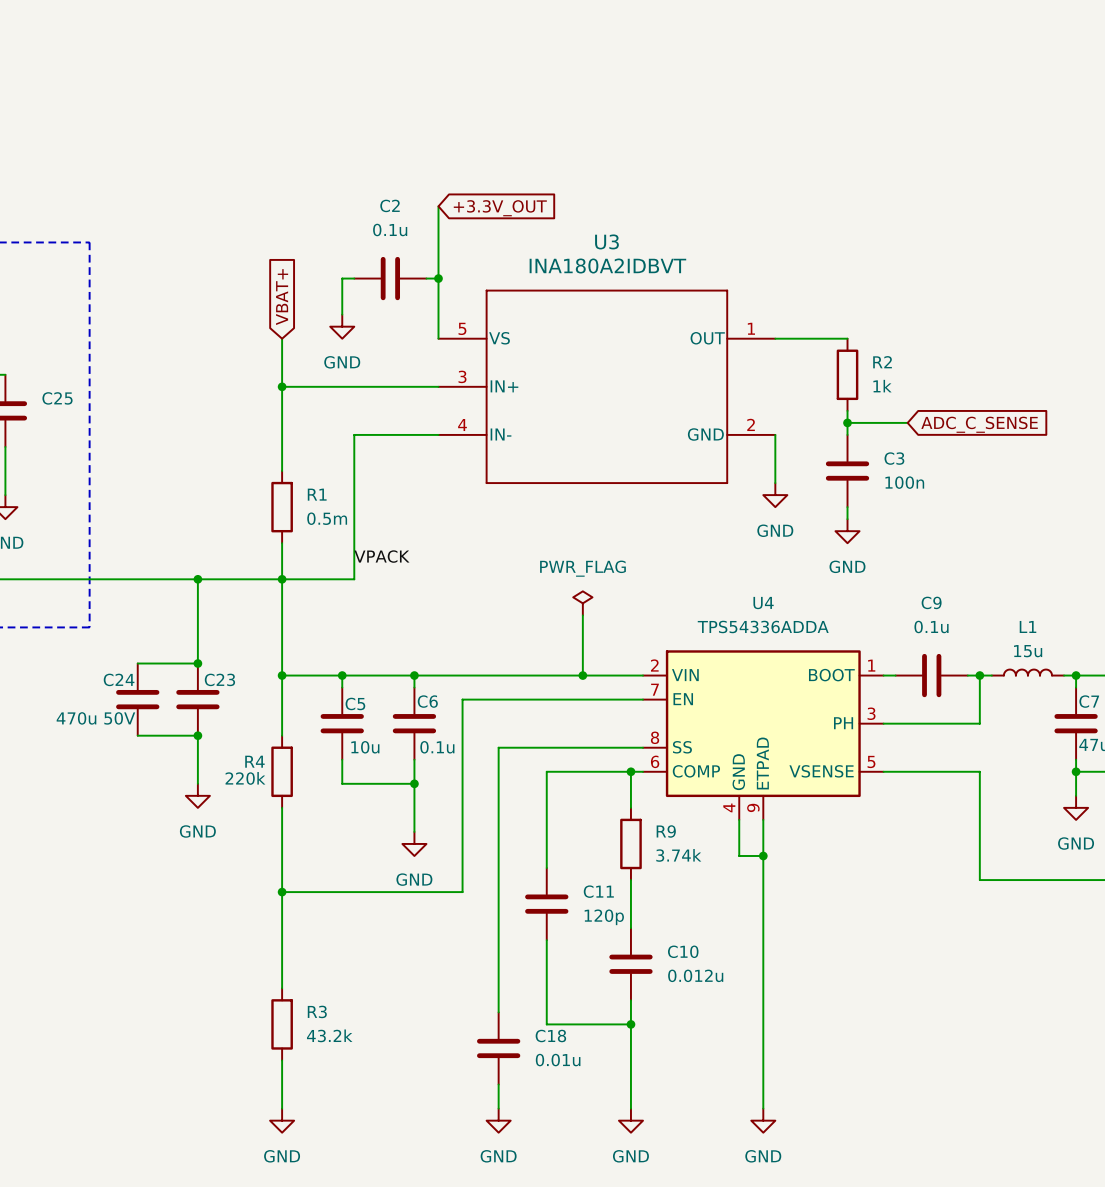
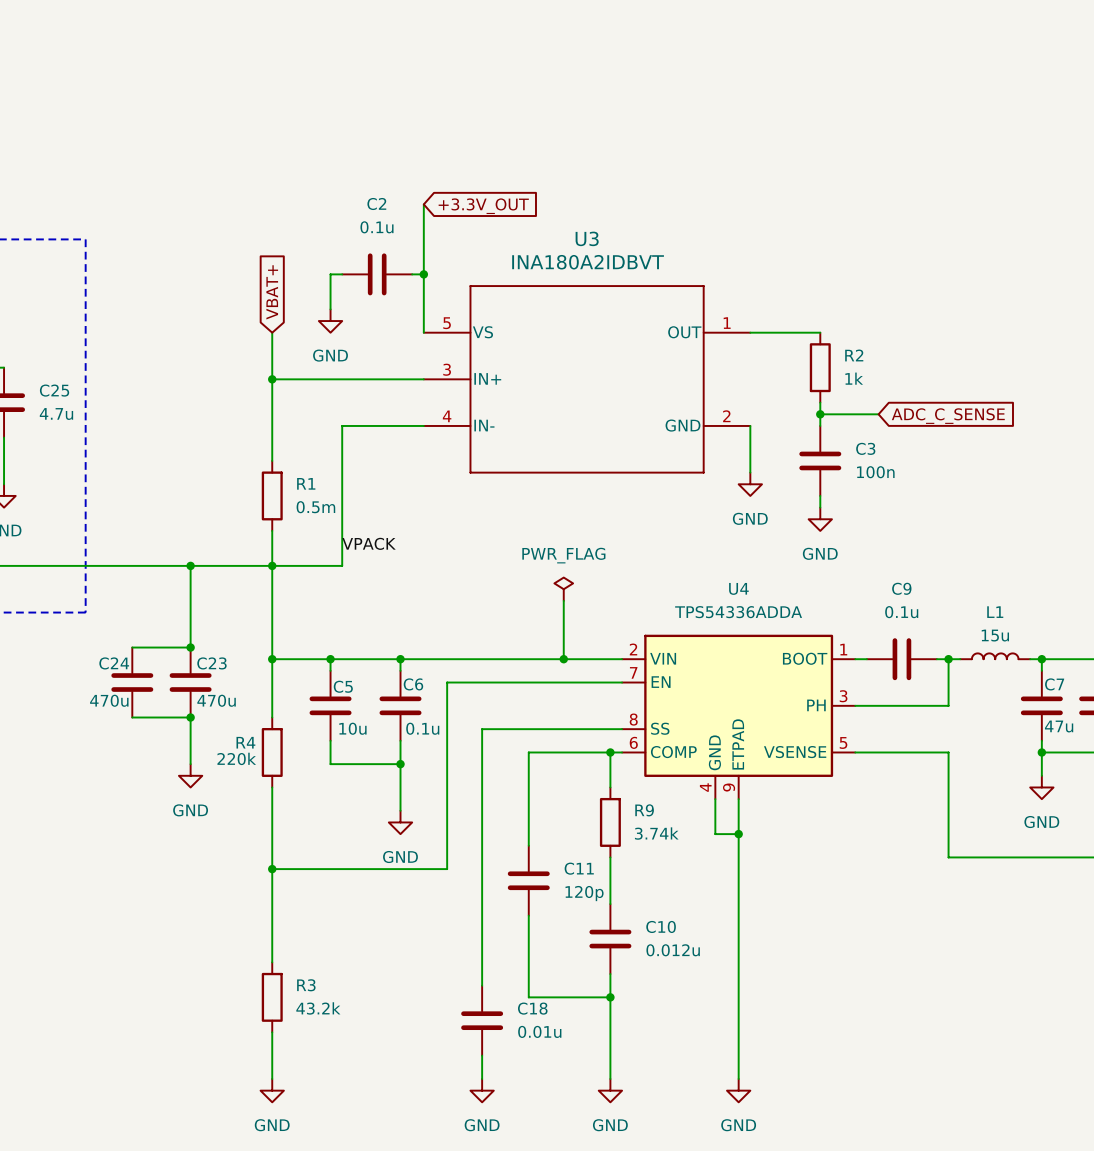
C25 value: none -> 4.7u (56, 414)
C24 value: 470u 50V (95, 718) -> 470u (109, 700)
C23 value: none -> 470u (216, 700)

